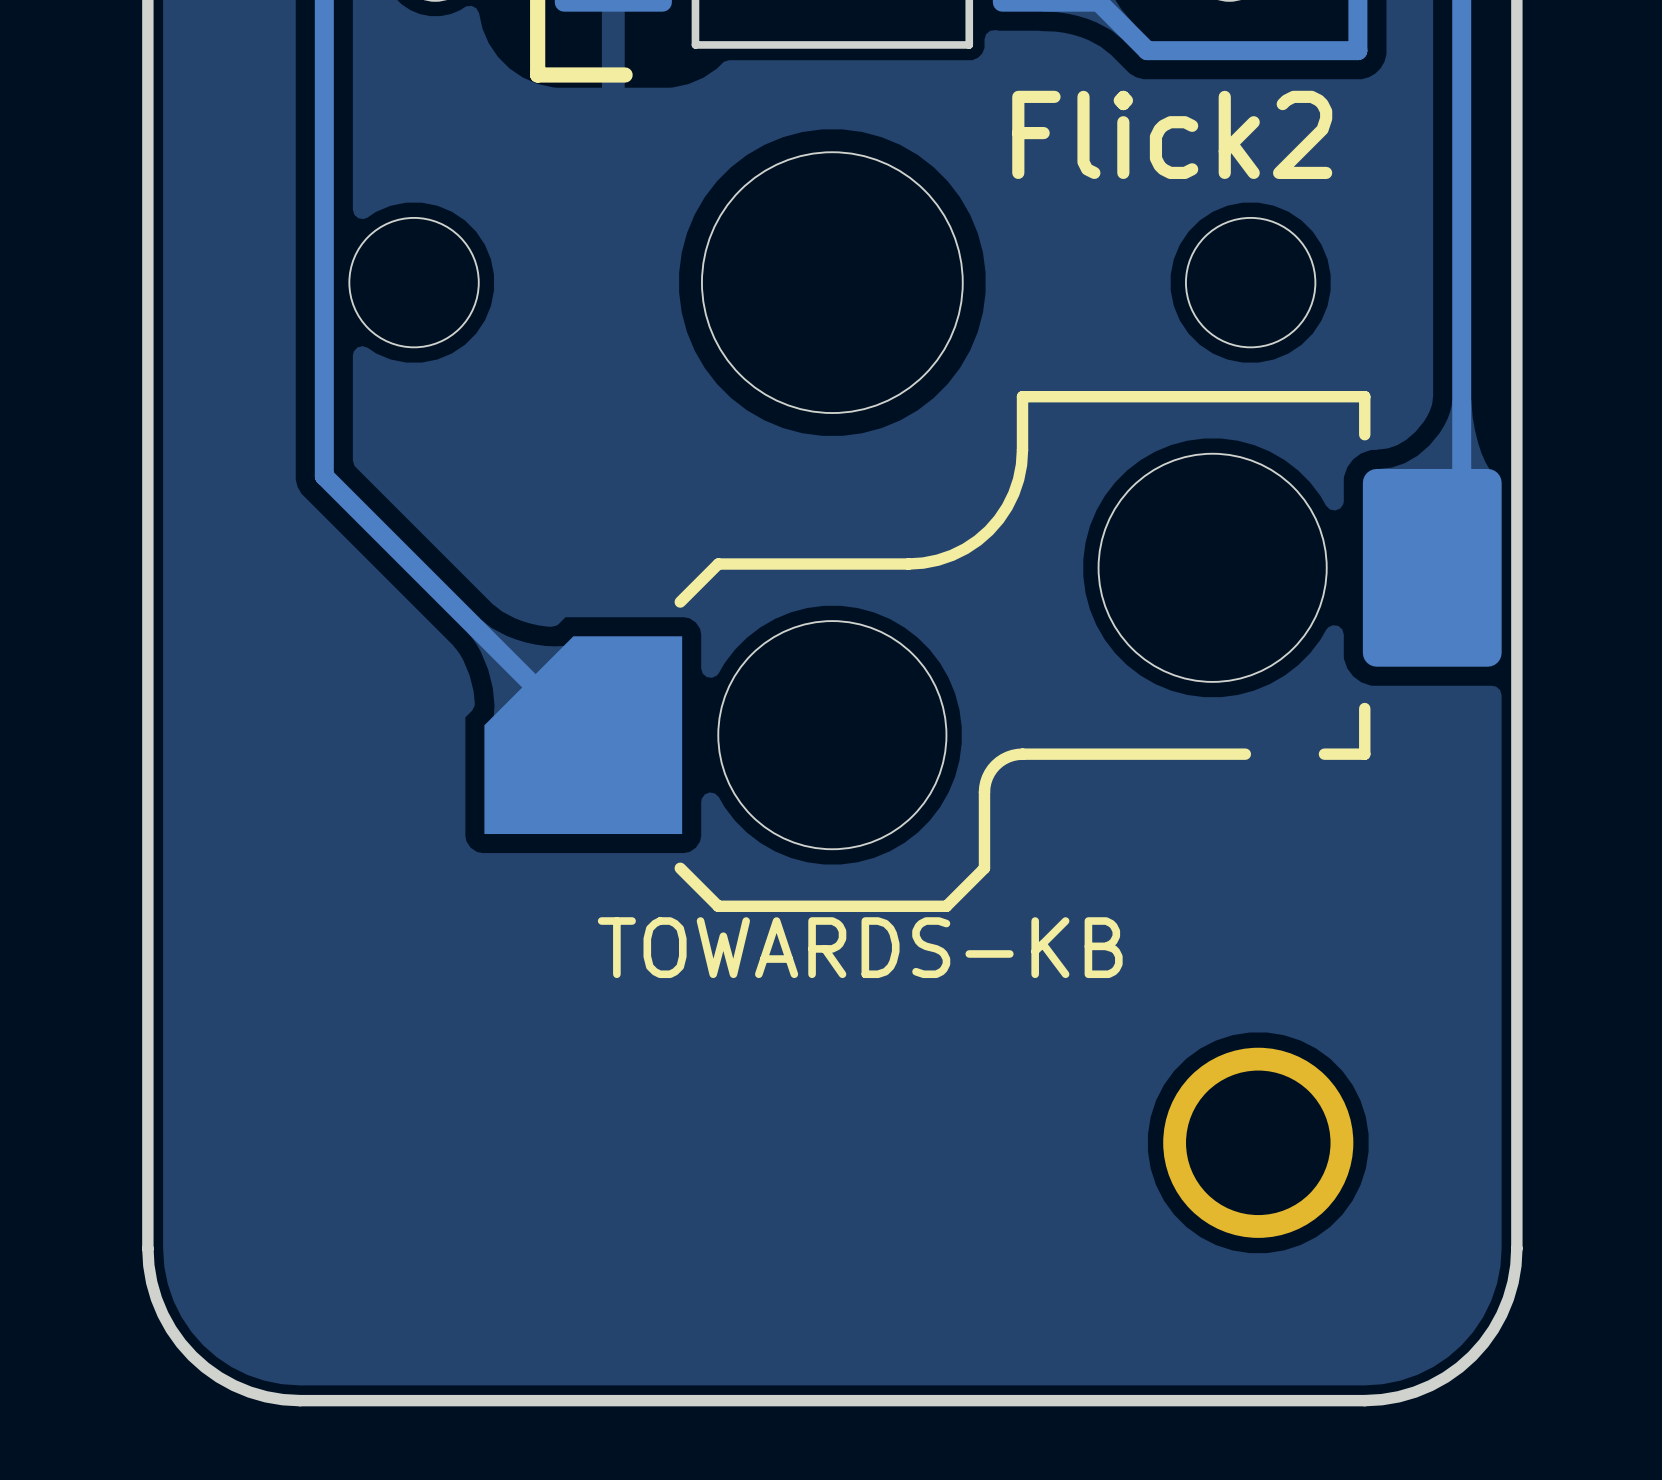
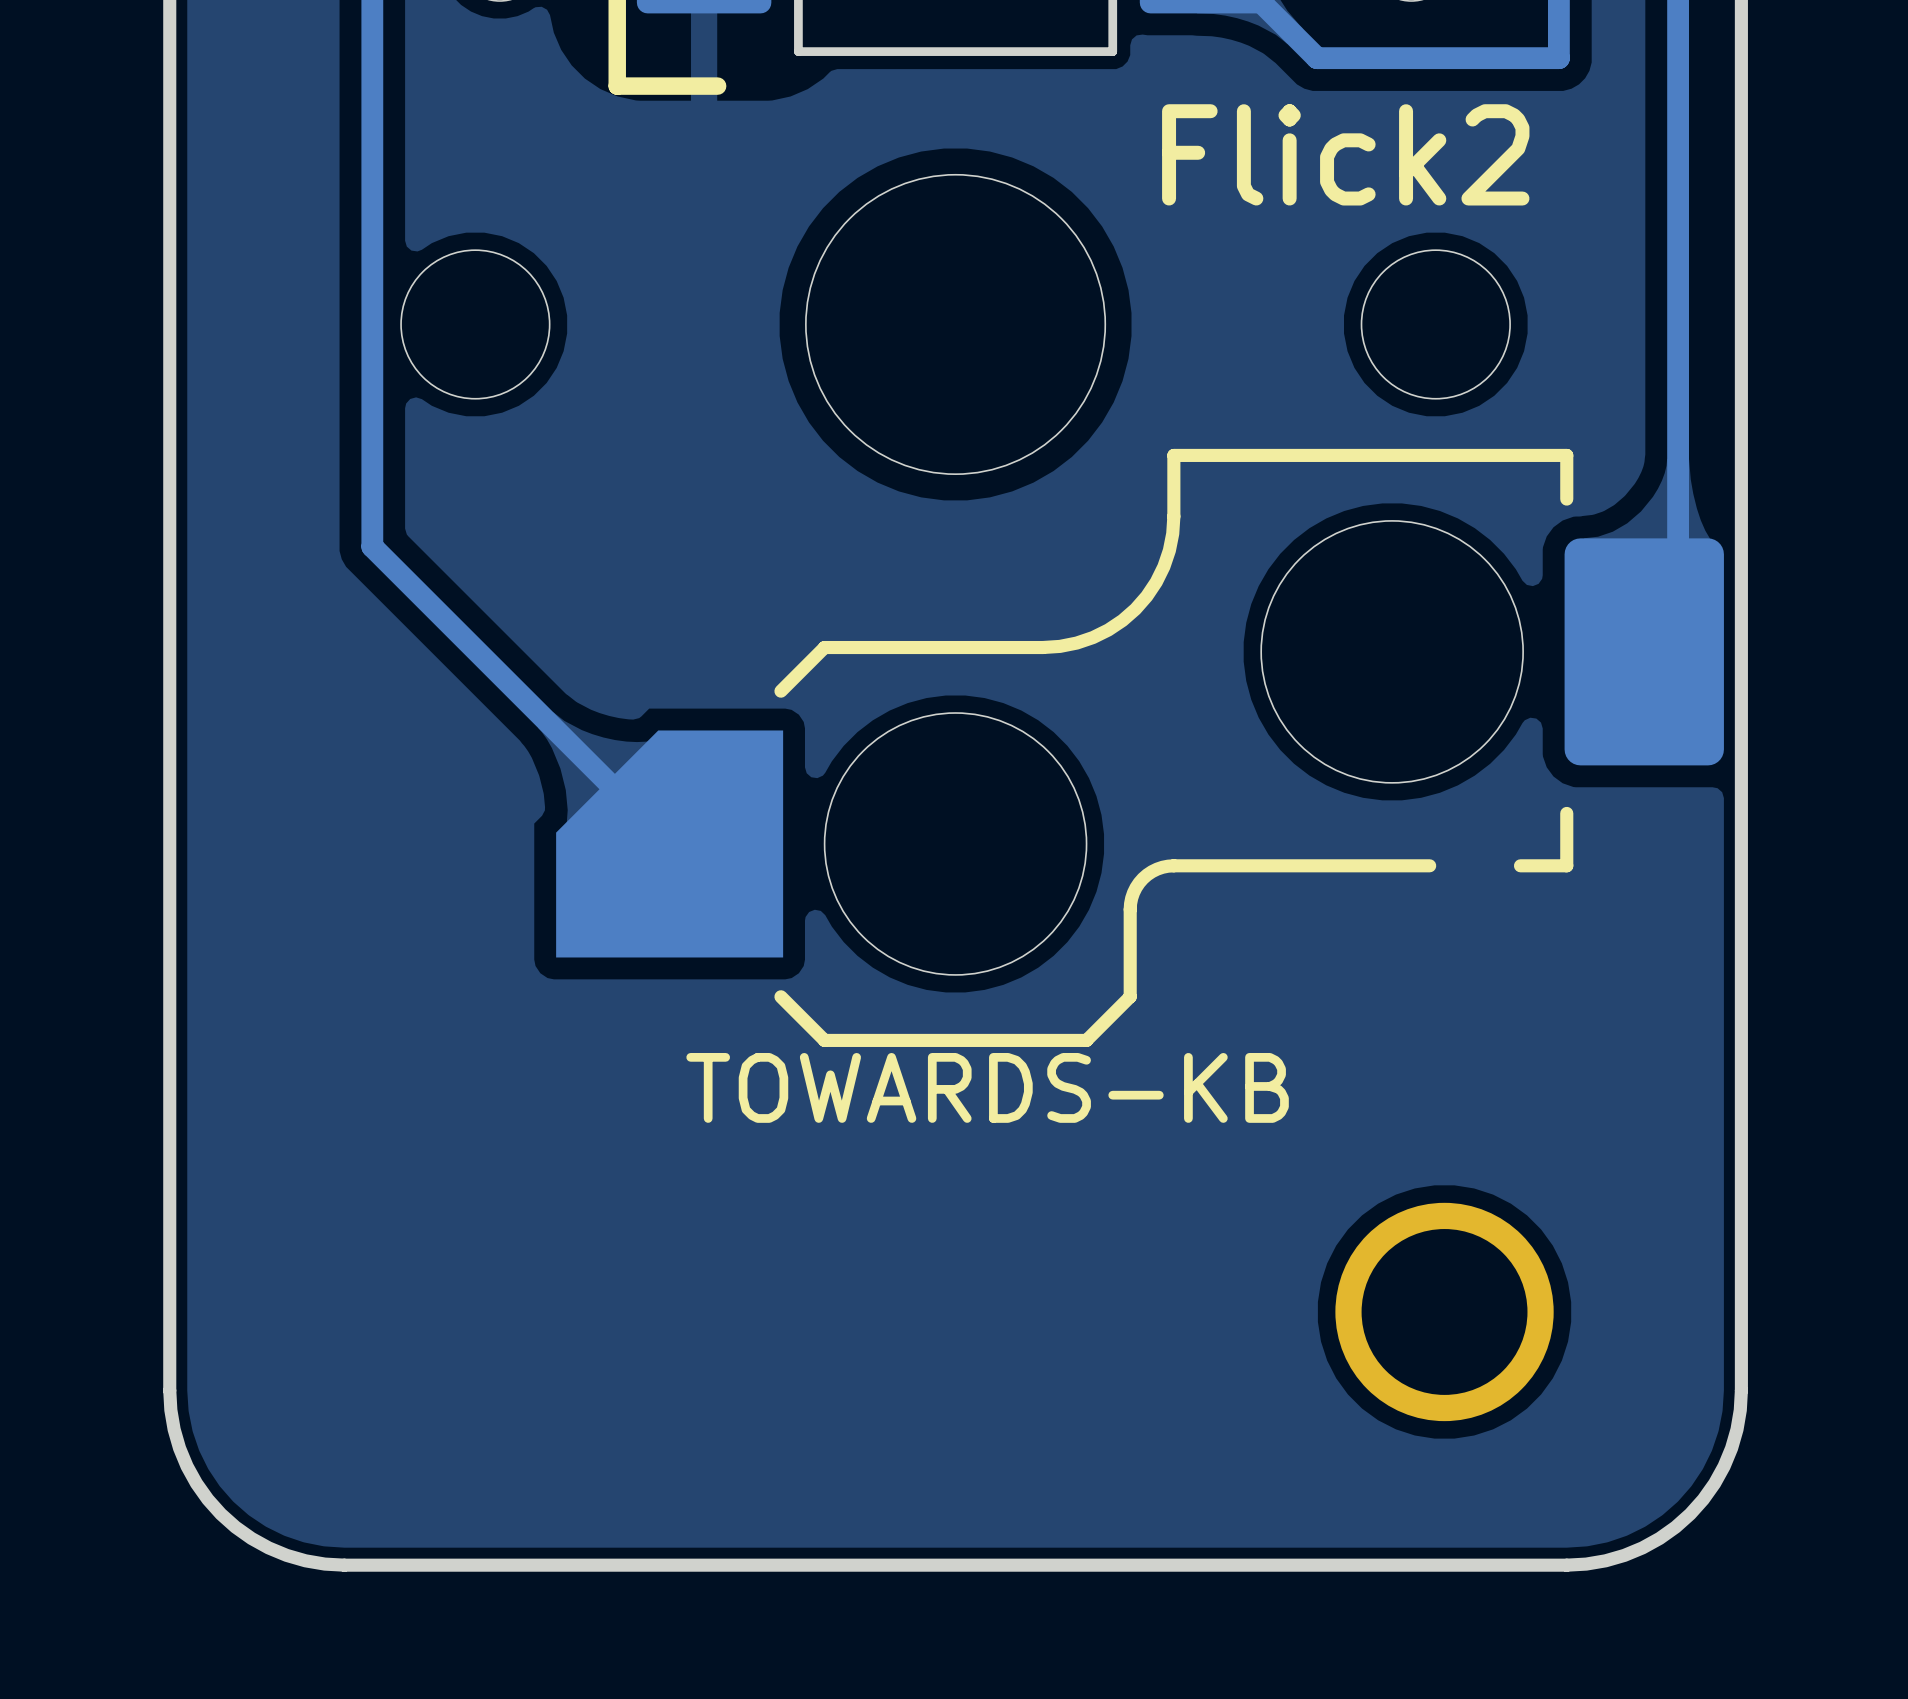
board edge: (1516, 1211) (1516, 1248) (1513, 1282) (1501, 1314) (1483, 1343) (1459, 1367) (1430, 1385) (1398, 1396) (1364, 1400) (282, 1399) (249, 1392) (219, 1377) (192, 1356) (181, 1343) (162, 1314) (151, 1282) (147, 1248) (147, 1211) -> (1741, 1390) (1740, 1410) (1731, 1448) (1714, 1483) (1690, 1514) (1659, 1538) (1624, 1555) (1586, 1564) (1566, 1565) (324, 1564) (286, 1555) (268, 1547) (235, 1527) (207, 1499) (187, 1466) (179, 1448) (170, 1410) (169, 1390)

